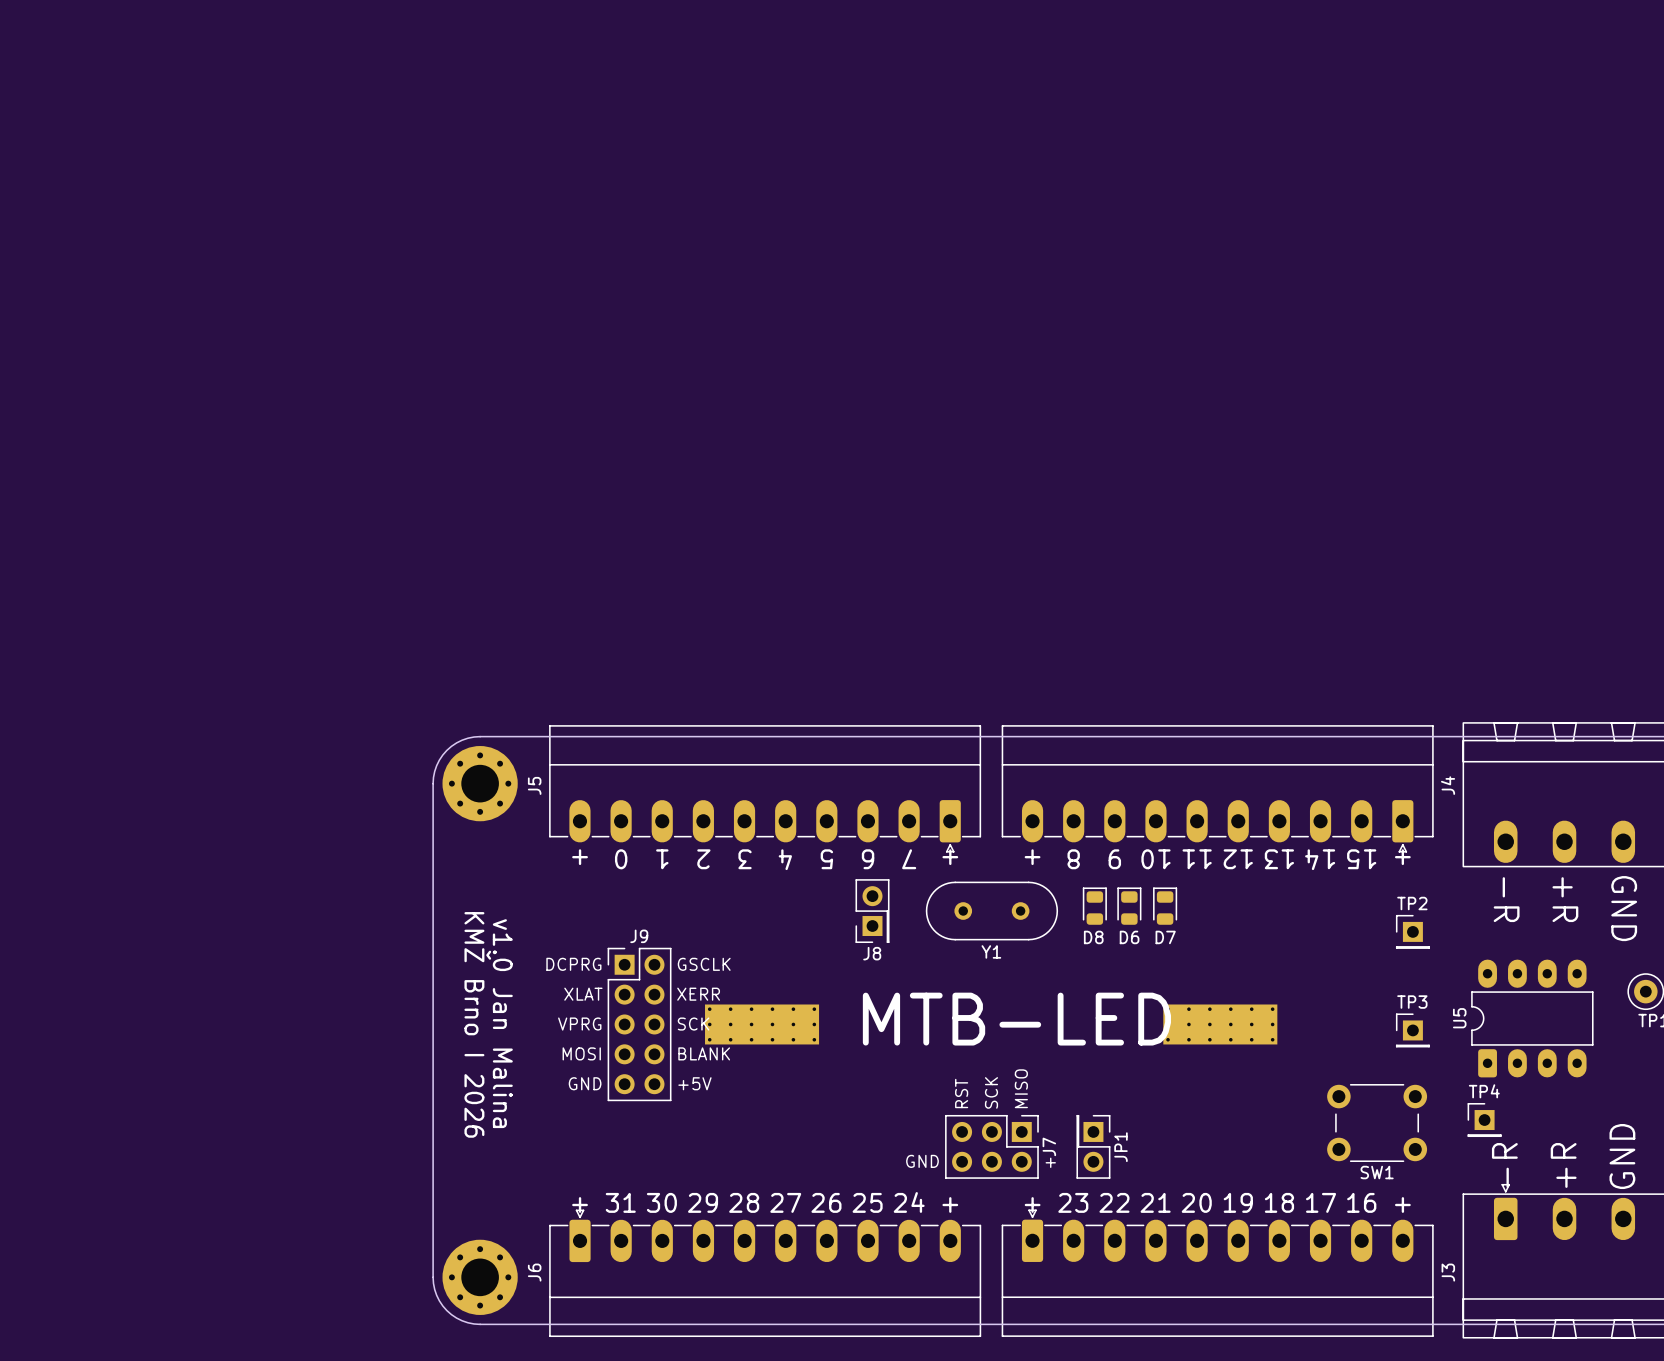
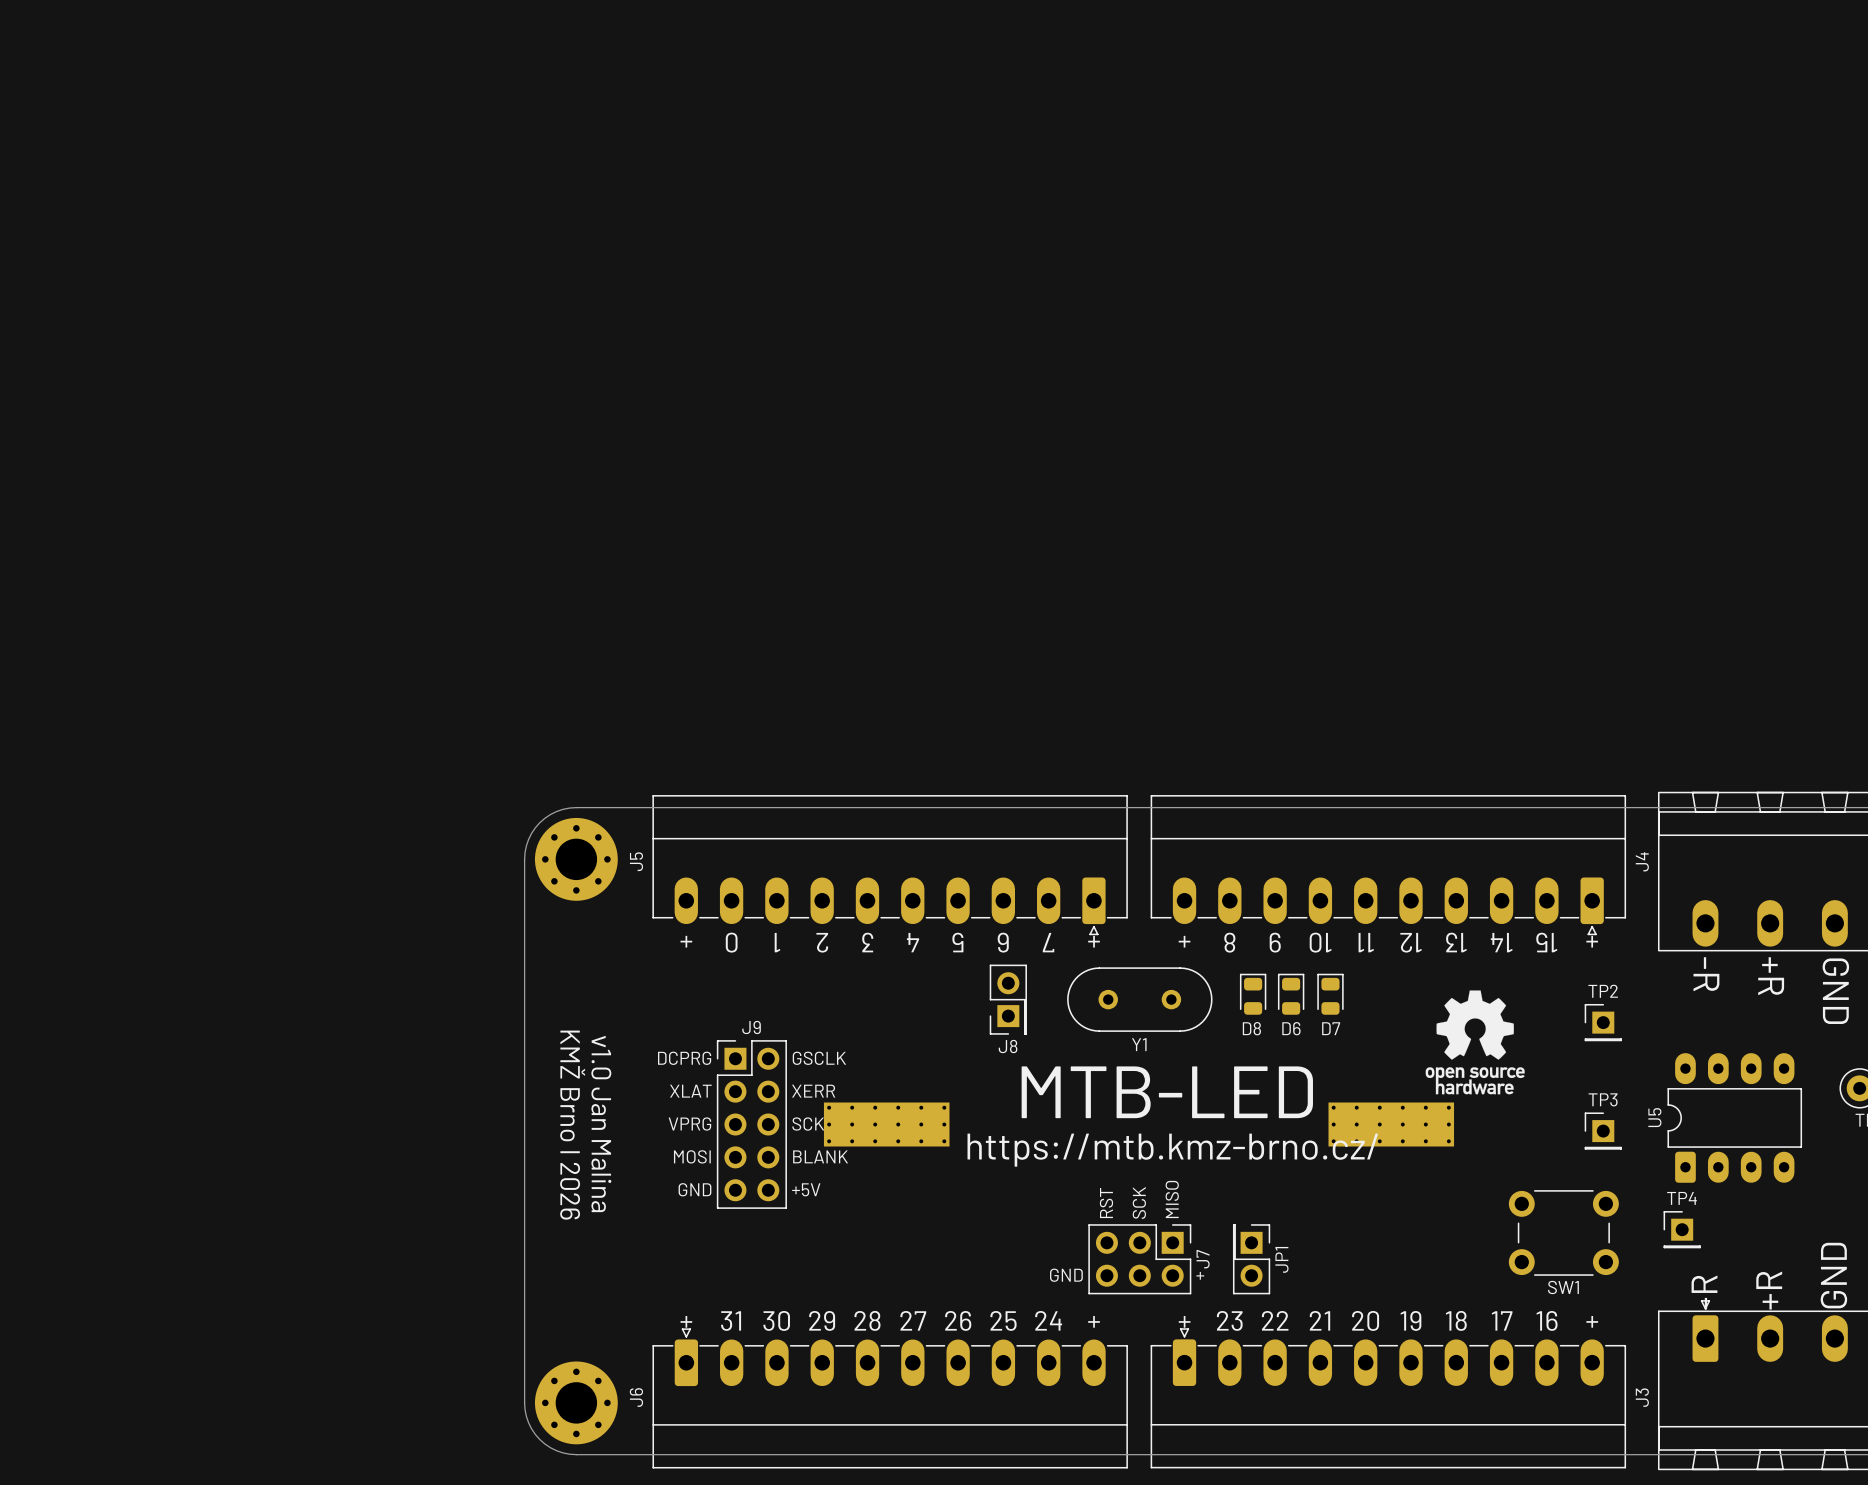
drawing: none -> [1425, 990, 1525, 1095]
text: none -> MTB-LED (1167, 1092)
text: MTB-LED (1016, 1019) -> https://mtb.kmz-brno.cz/ (1172, 1150)

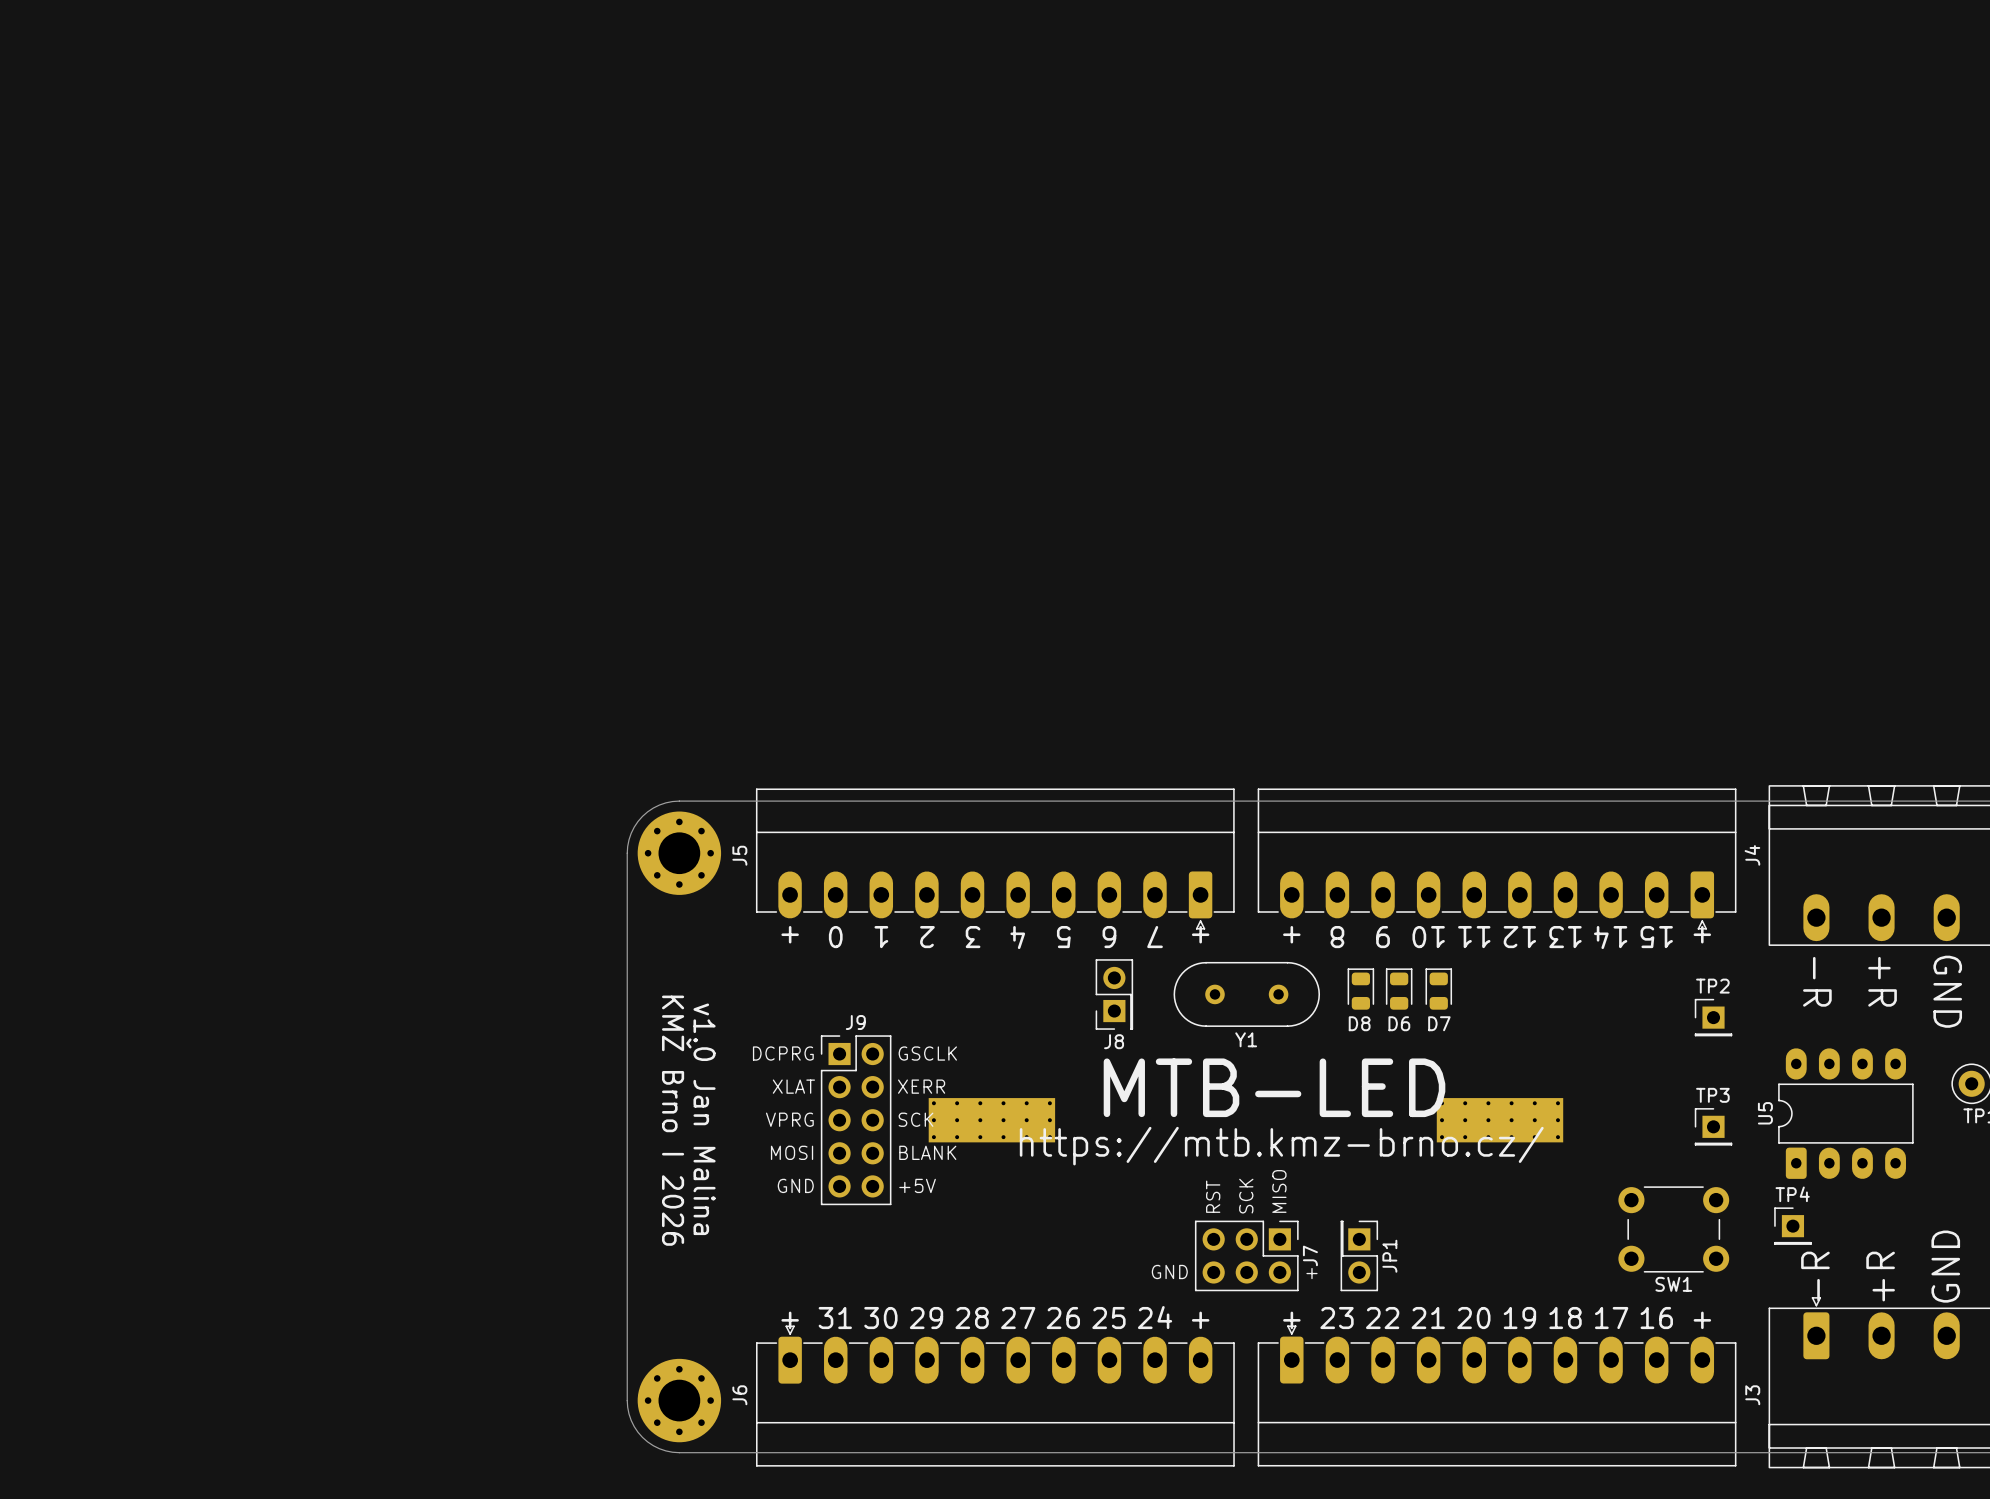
drawing: [1425, 990, 1525, 1095] -> none

